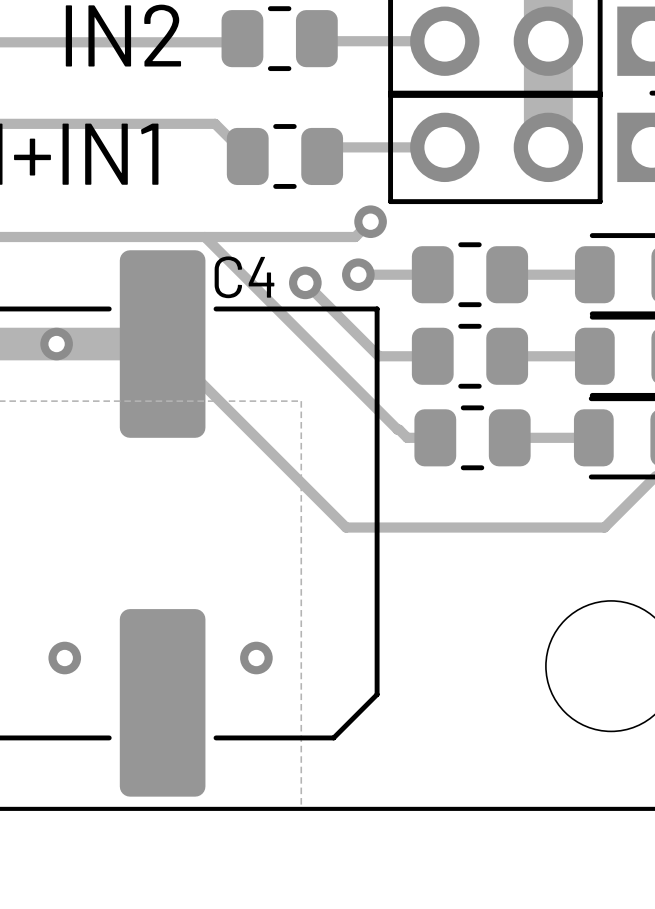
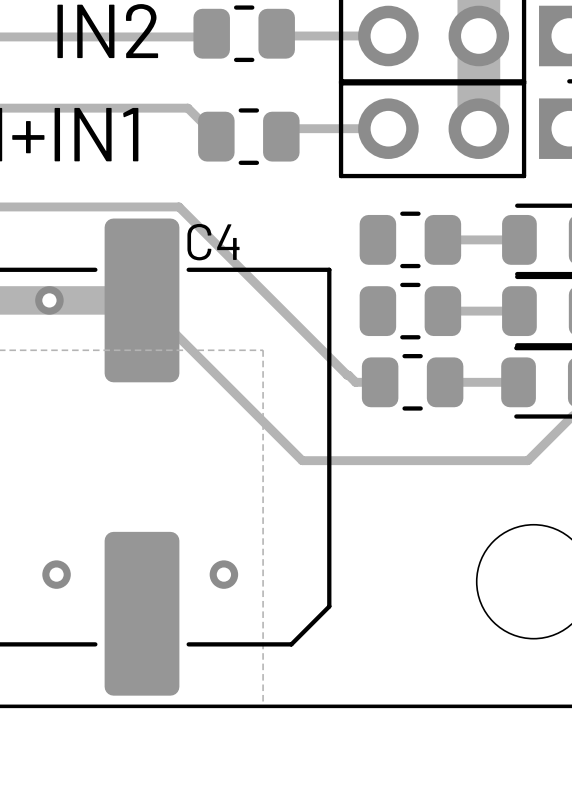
track: (370, 221) (355, 237) (204, 237) -> none
via: (370, 221) -> none
track: (358, 274) (432, 274) -> none
via: (358, 274) -> none
track: (305, 282) (378, 356) (432, 356) -> none
via: (305, 282) -> none

